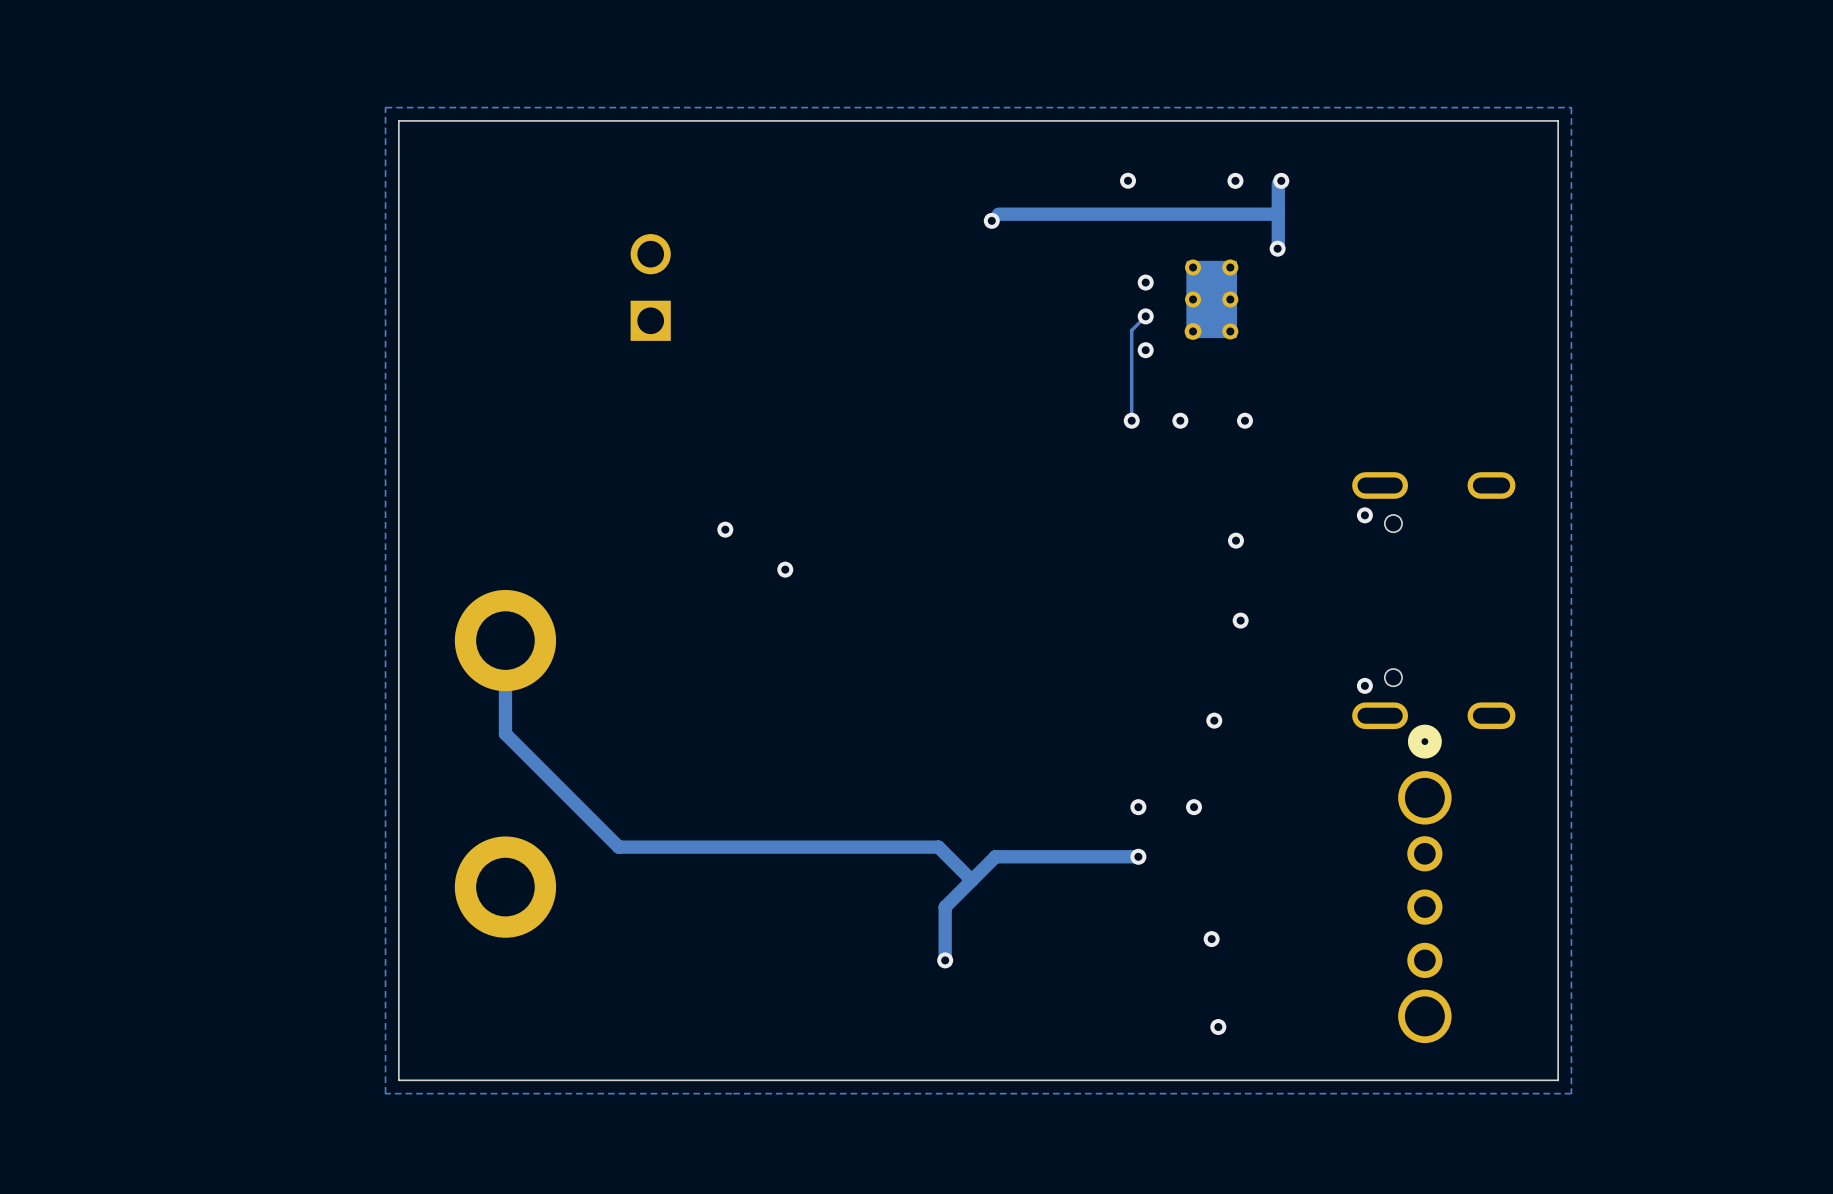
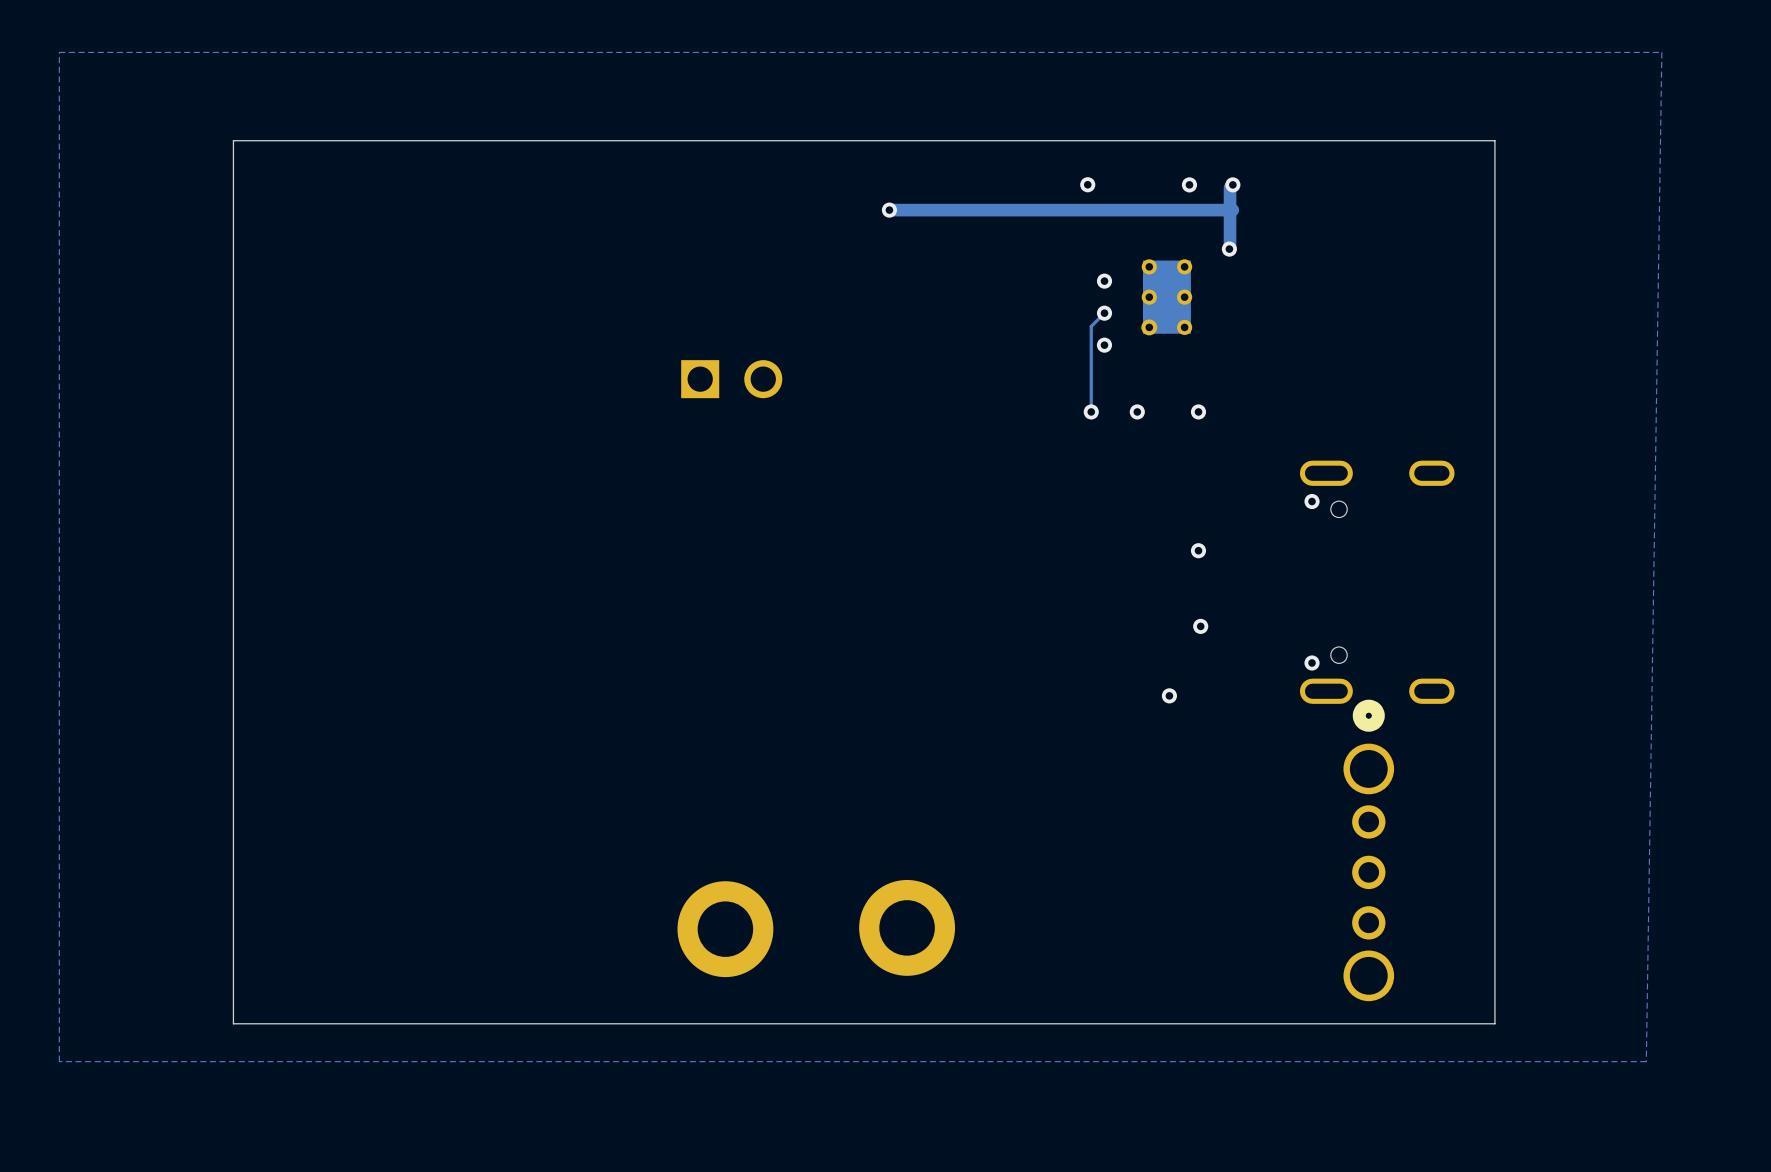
zone outline: (1571, 107) (385, 107) (385, 1093) (1571, 1093) (1571, 107) -> (1661, 52) (1646, 1061) (59, 1061) (59, 52) (1661, 52)
board edge: (1558, 134) (1558, 120) (398, 120) (398, 1080) (1558, 1080) (1558, 1066) -> (1494, 140) (233, 140) (233, 1023) (1494, 1023)
track: none -> (1232, 210) (889, 210)
track: (1278, 214) (998, 214) (991, 220) -> none
via position: (991, 220) -> (889, 210)
part rotation: 0° (650, 287) -> 90° clockwise (731, 379)
part position: (650, 287) -> (731, 379)
via: (725, 529) -> none
via: (1235, 540) -> none
via: none -> (1198, 550)
via: (785, 569) -> none
via: (1240, 620) -> none
track: (505, 640) (505, 733) (618, 847) (938, 847) (971, 880) -> none
part: (505, 640) -> none
via: none -> (1200, 626)
via: (1138, 807) -> none
via: (1194, 807) -> none
track: (1138, 856) (995, 856) (945, 907) (945, 960) -> none
via: (1138, 856) -> none
part: (505, 887) -> none
via: (1211, 939) -> none
via: (945, 960) -> none
part: none -> (907, 927)
part: none -> (725, 929)
via: (1218, 1027) -> none

